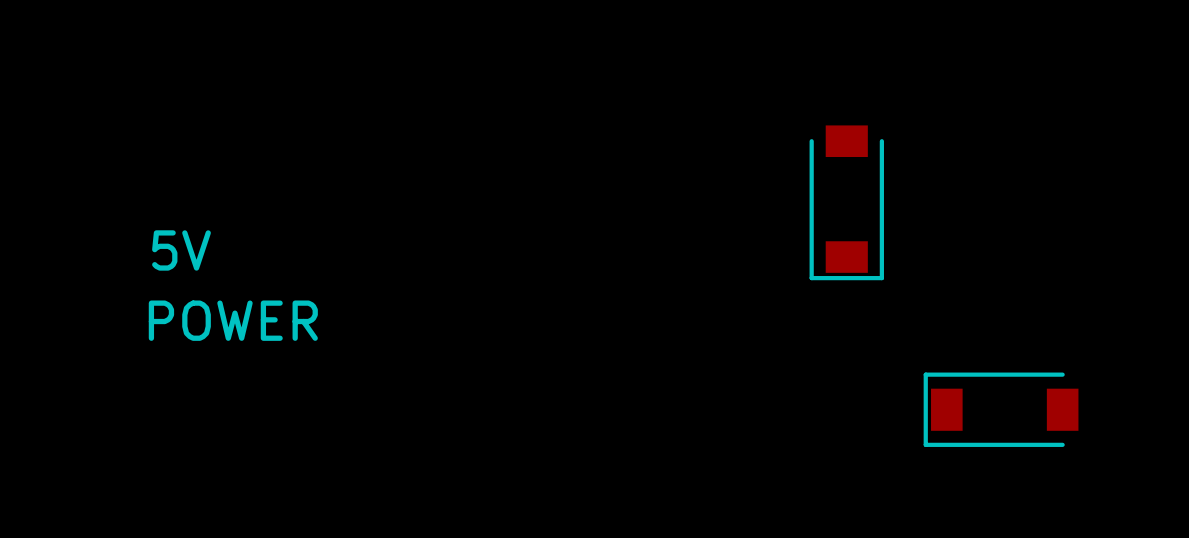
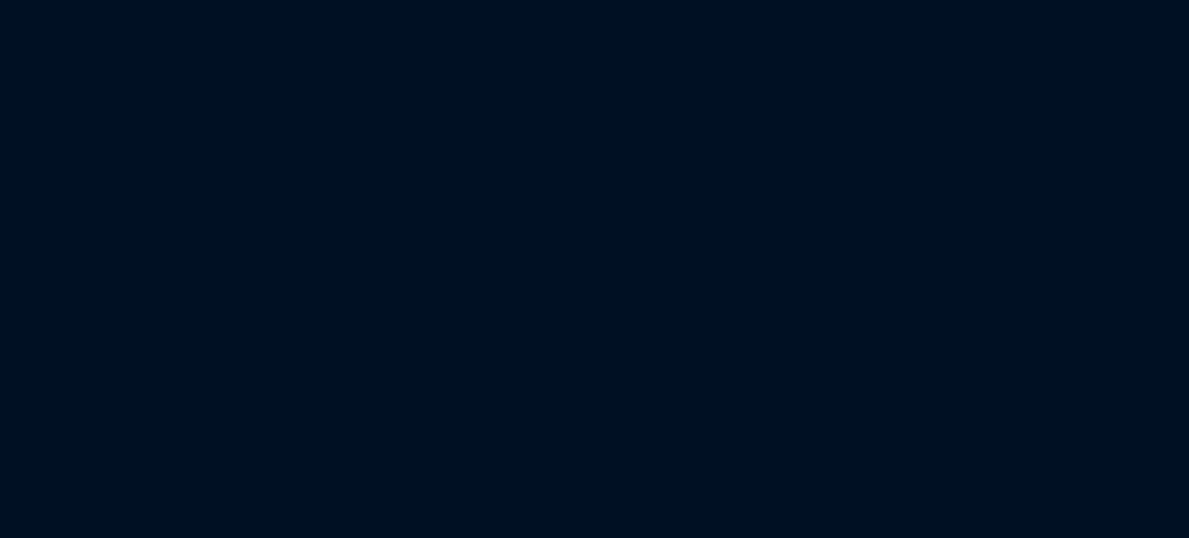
part: (846, 202) -> none
text: 5V (181, 250) -> none
text: POWER (233, 320) -> none
part: (1001, 409) -> none

